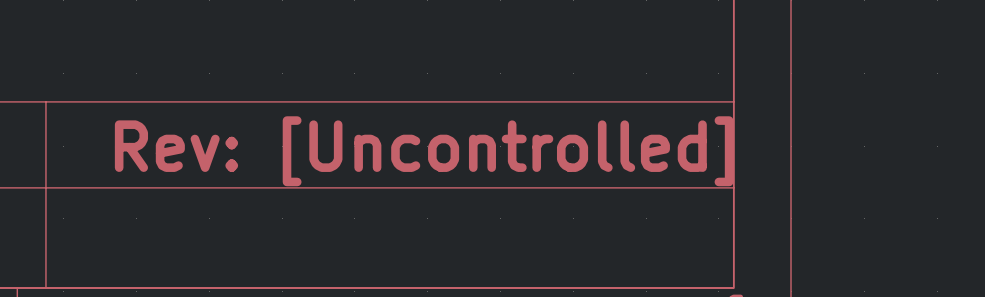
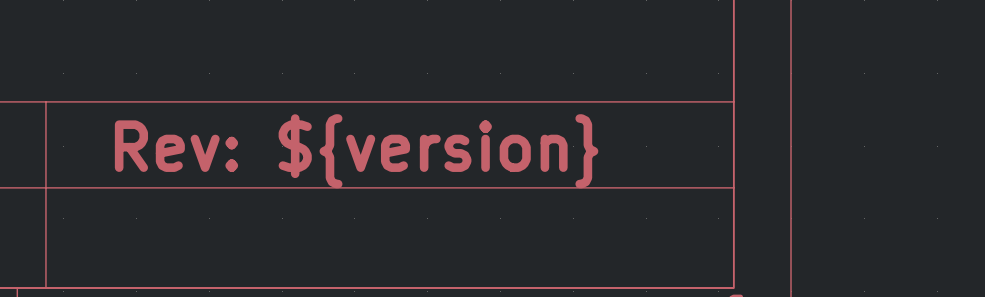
title block: Rev: [Uncontrolled] (424, 151) -> Rev: ${version} (356, 151)

